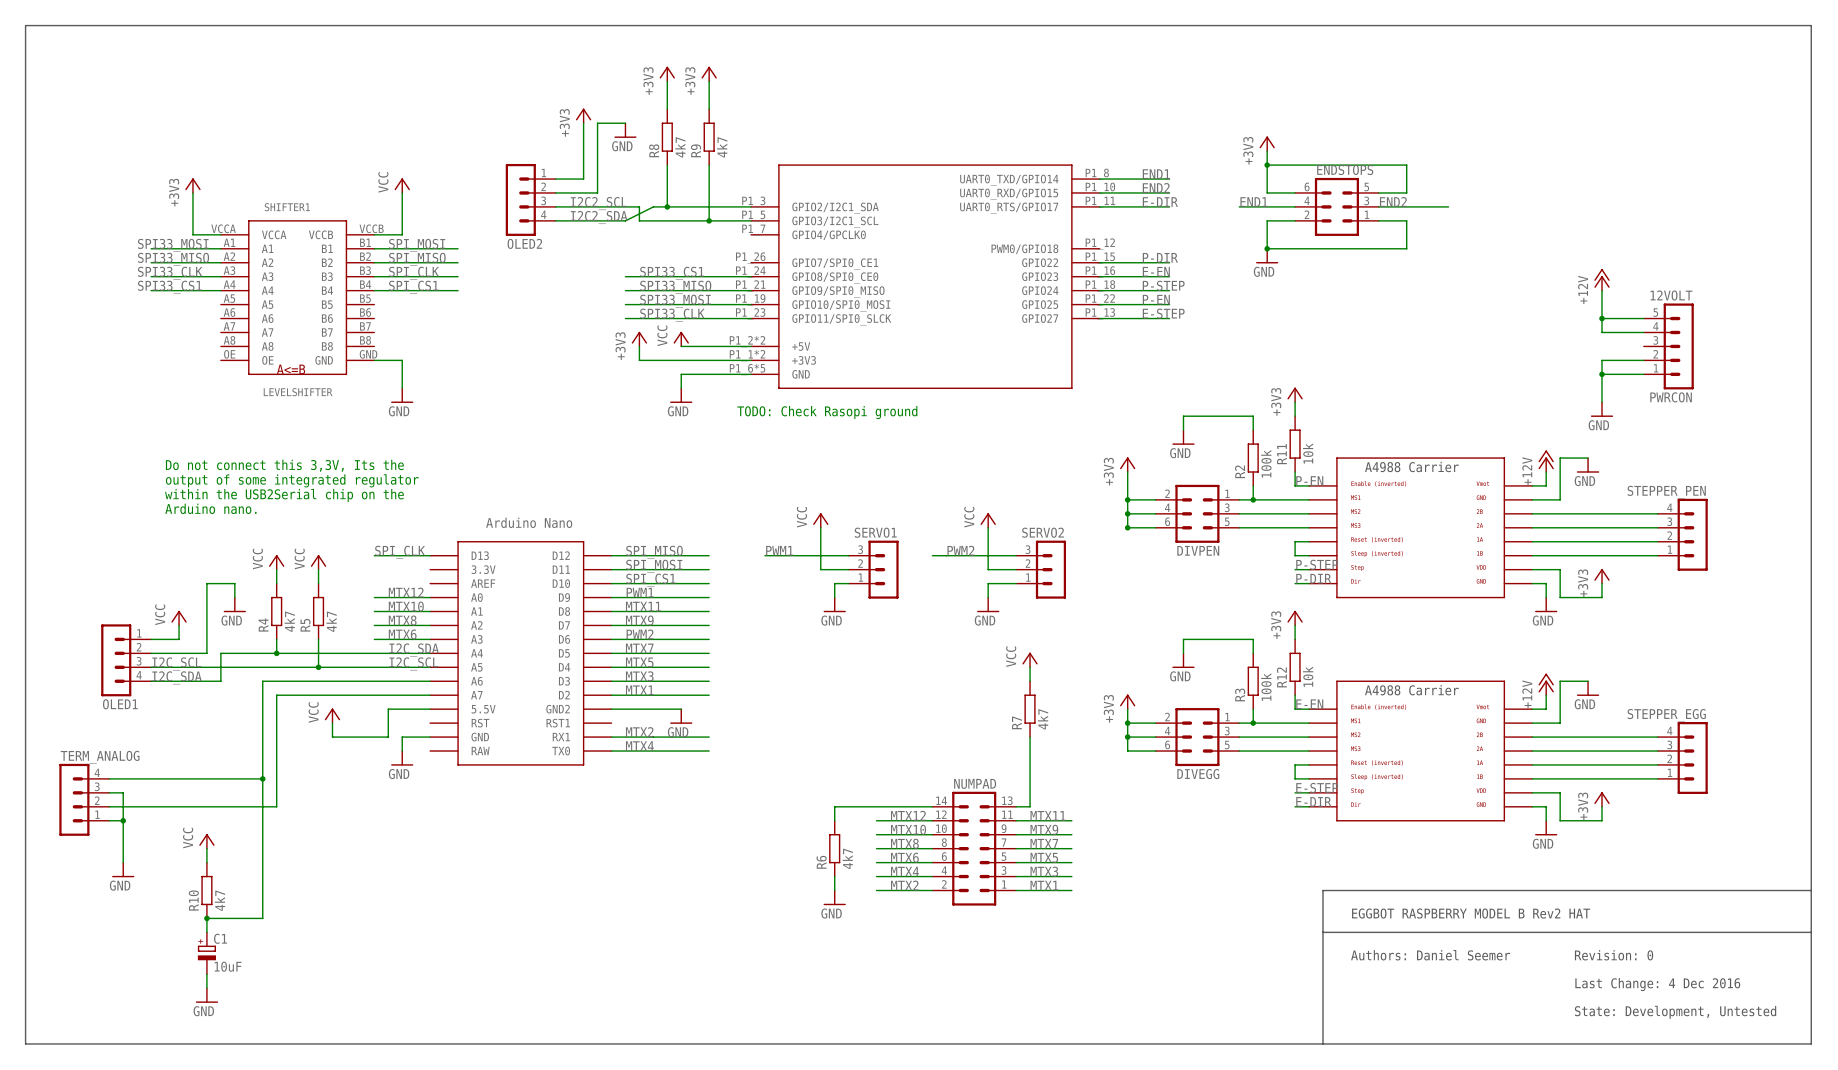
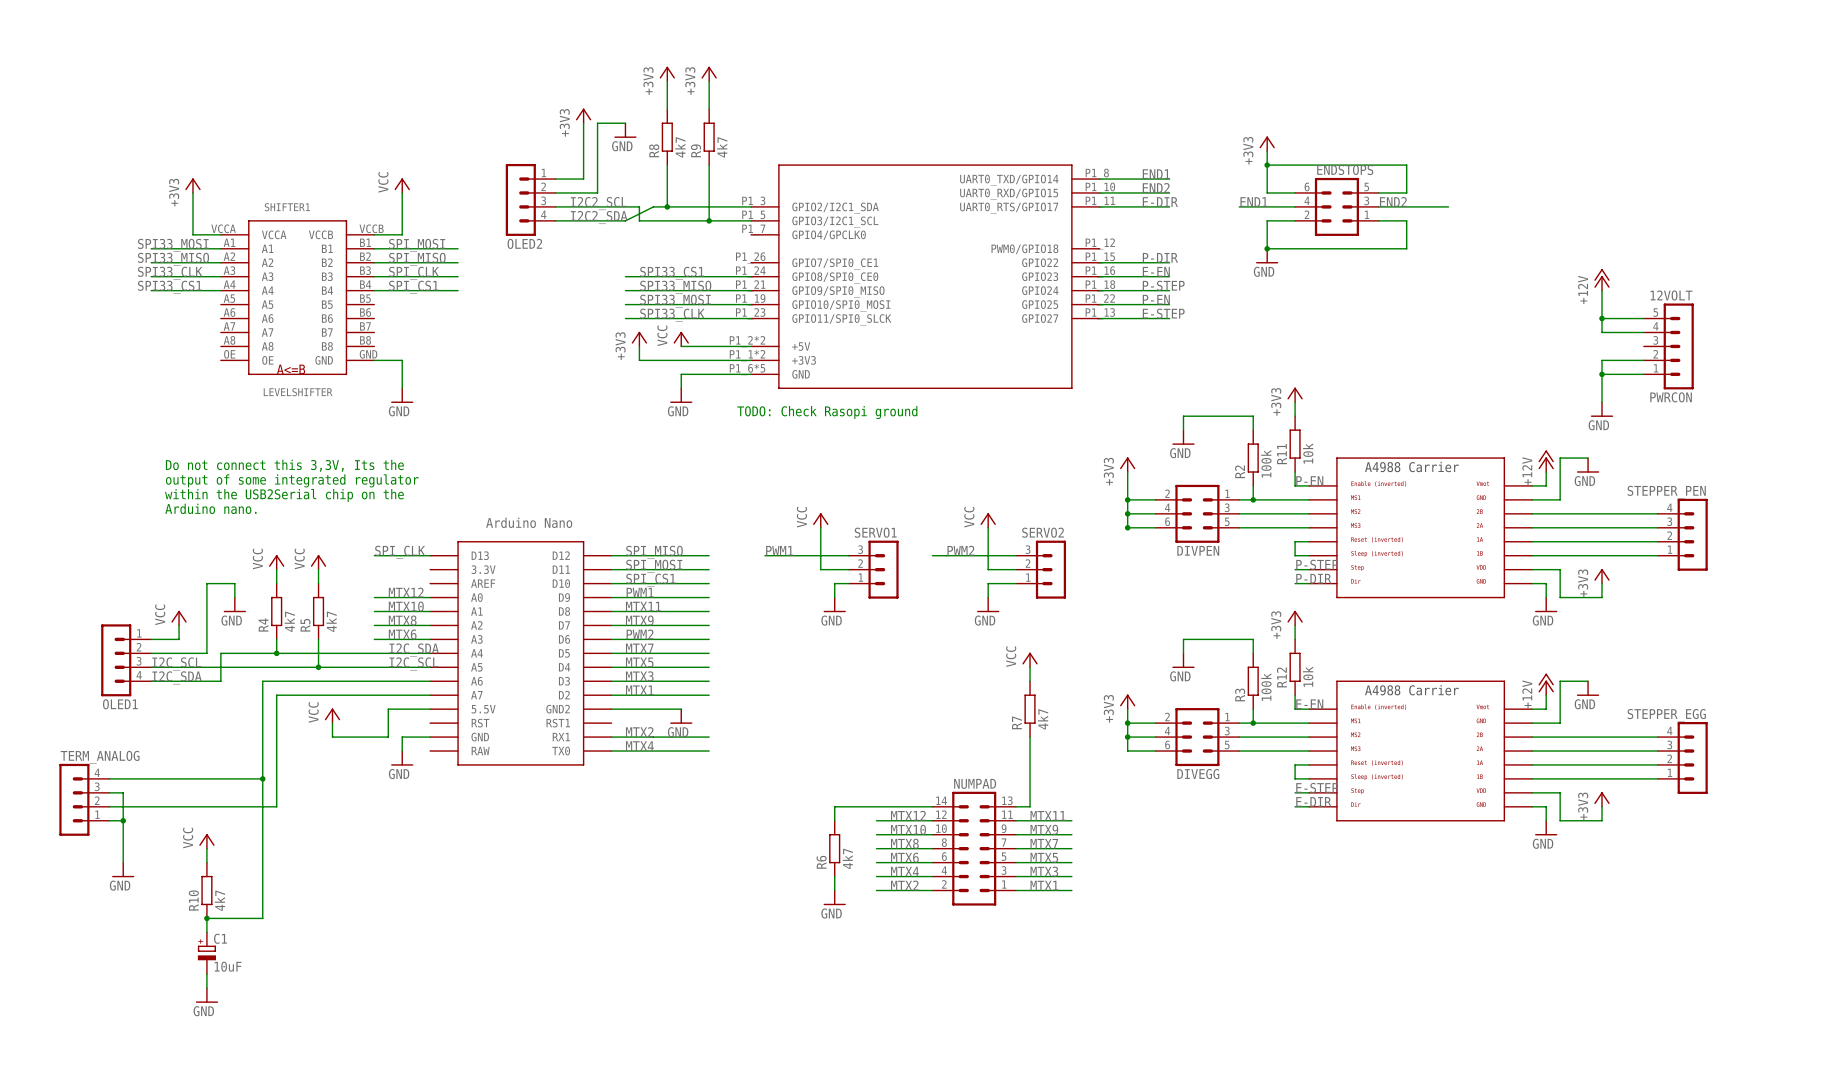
line: (25, 25) (25, 1043) (1811, 1043) (1811, 25) (25, 25) -> none
line: (1811, 890) (1322, 890) (1322, 1043) -> none
text: EGGBOT RASPBERRY MODEL B Rev2 HAT (1471, 913) -> none
line: (1322, 932) (1811, 932) -> none
text: Authors: Daniel Seemer (1430, 955) -> none
text: Revision: 0 (1614, 955) -> none
text: Last Change: 4 Dec 2016 (1657, 984) -> none
text: State: Development, Untested (1675, 1012) -> none

